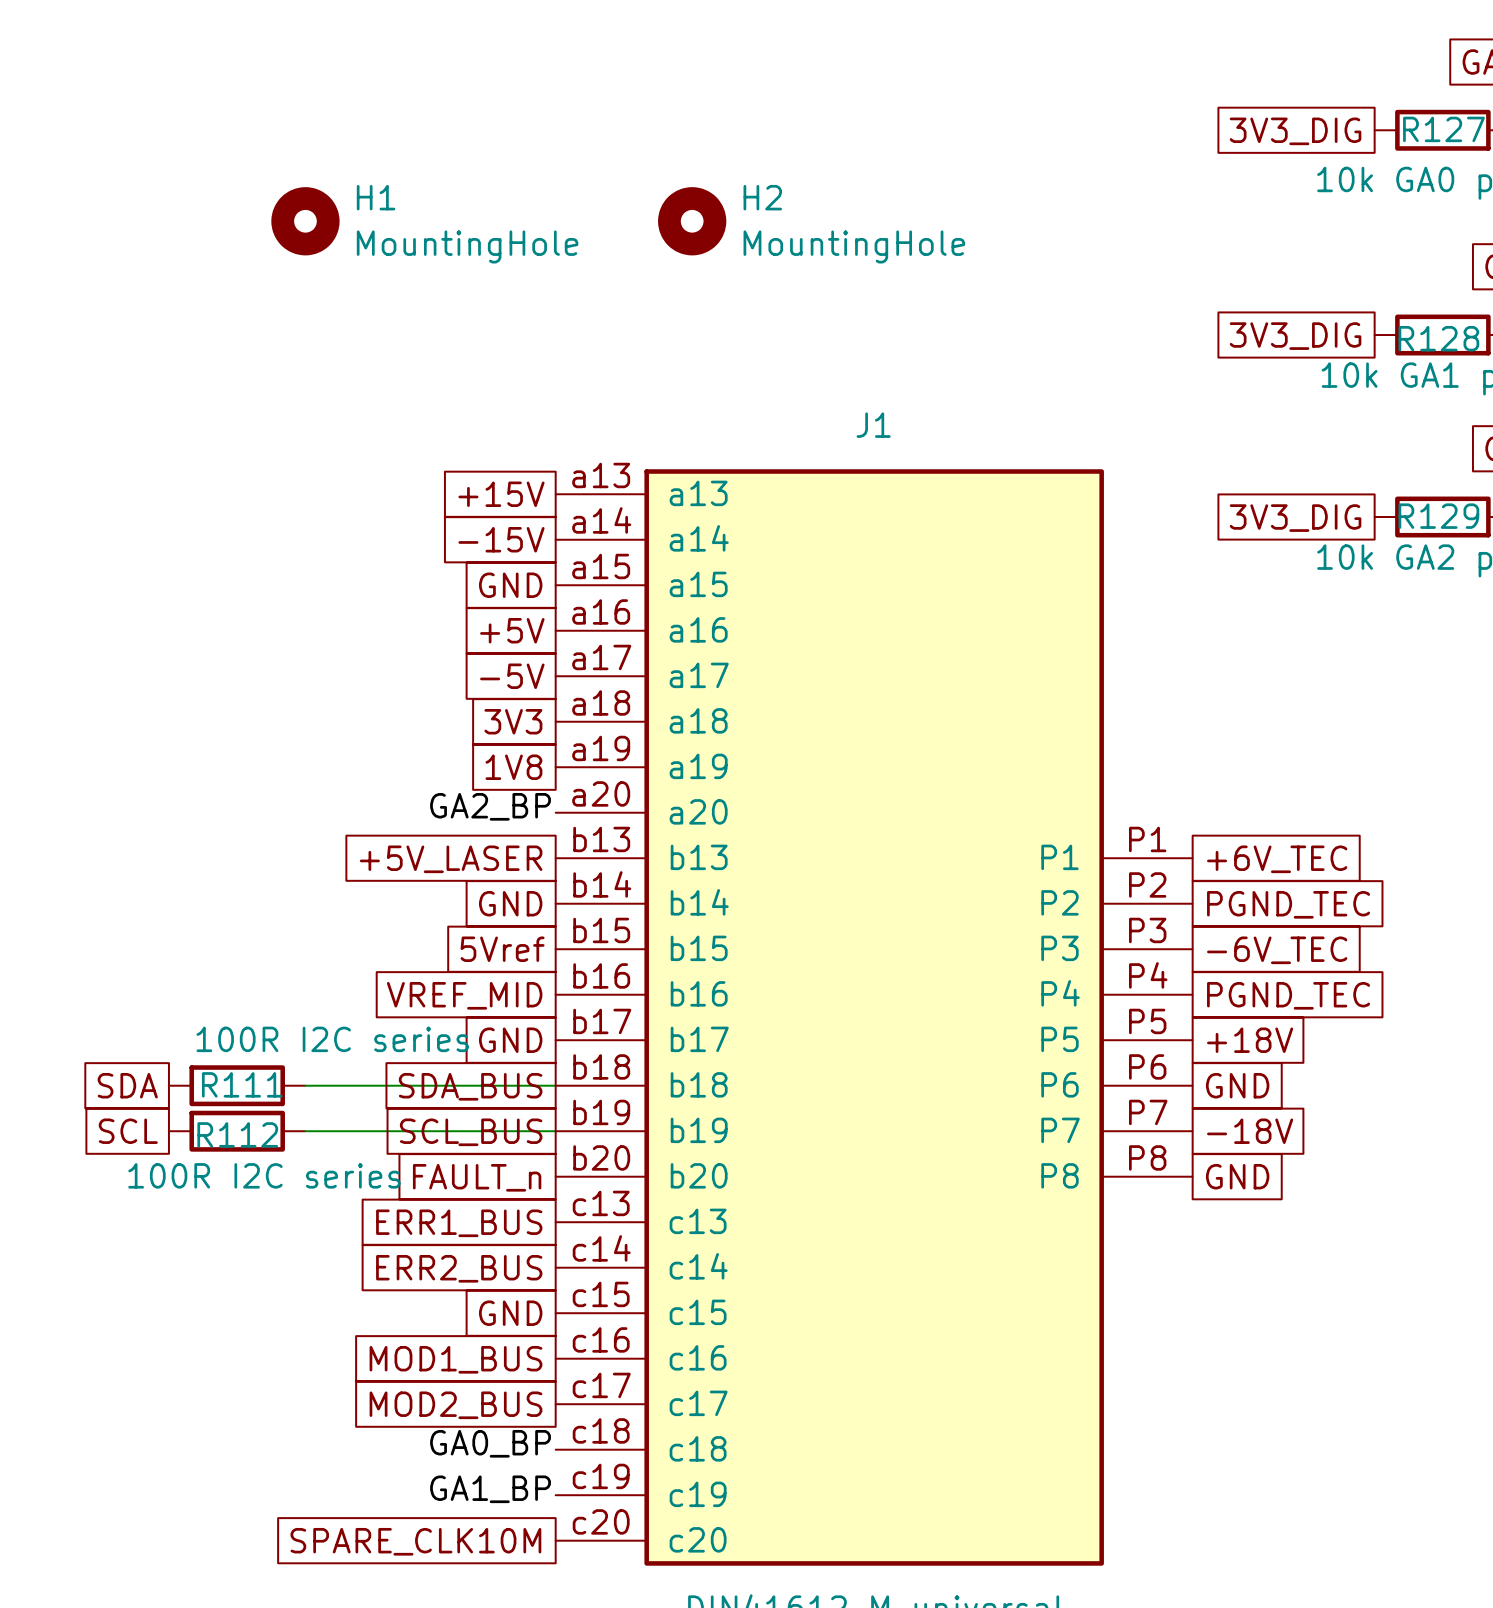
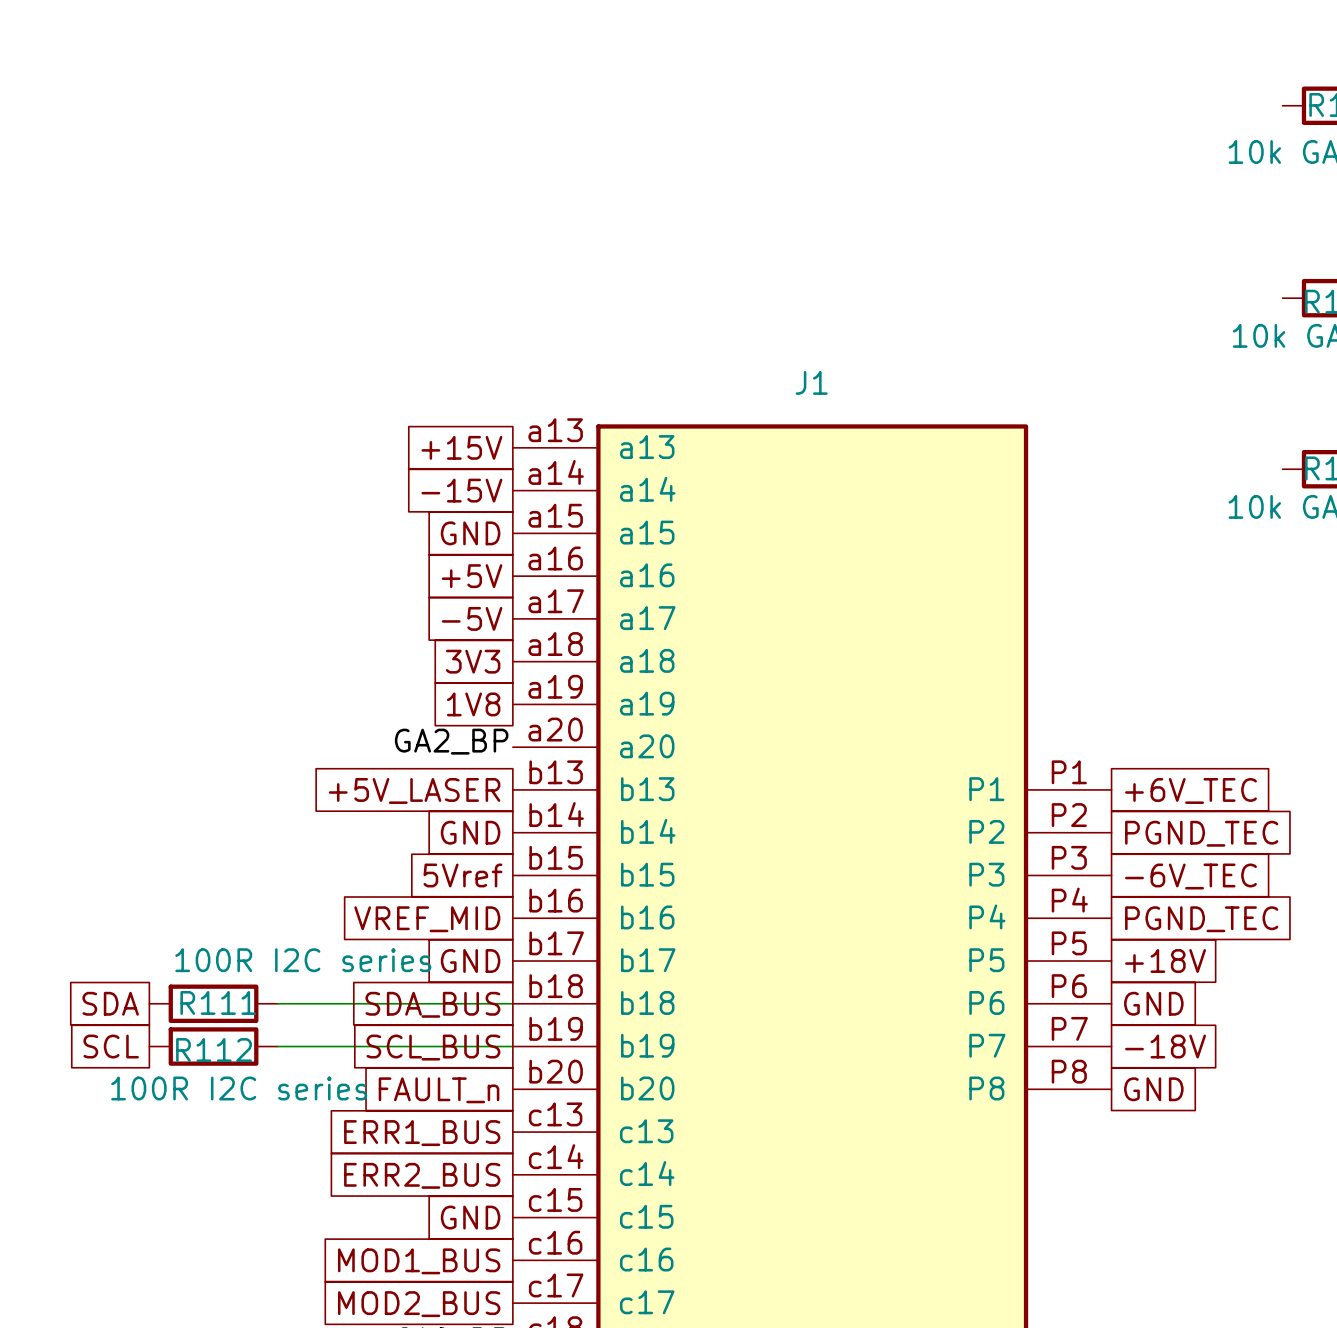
global label: 3V3_DIG (1295, 131) -> none
H1: MountingHole (305, 221) -> none
H2: MountingHole (692, 221) -> none
global label: 3V3_DIG (1295, 336) -> none
global label: 3V3_DIG (1295, 518) -> none

